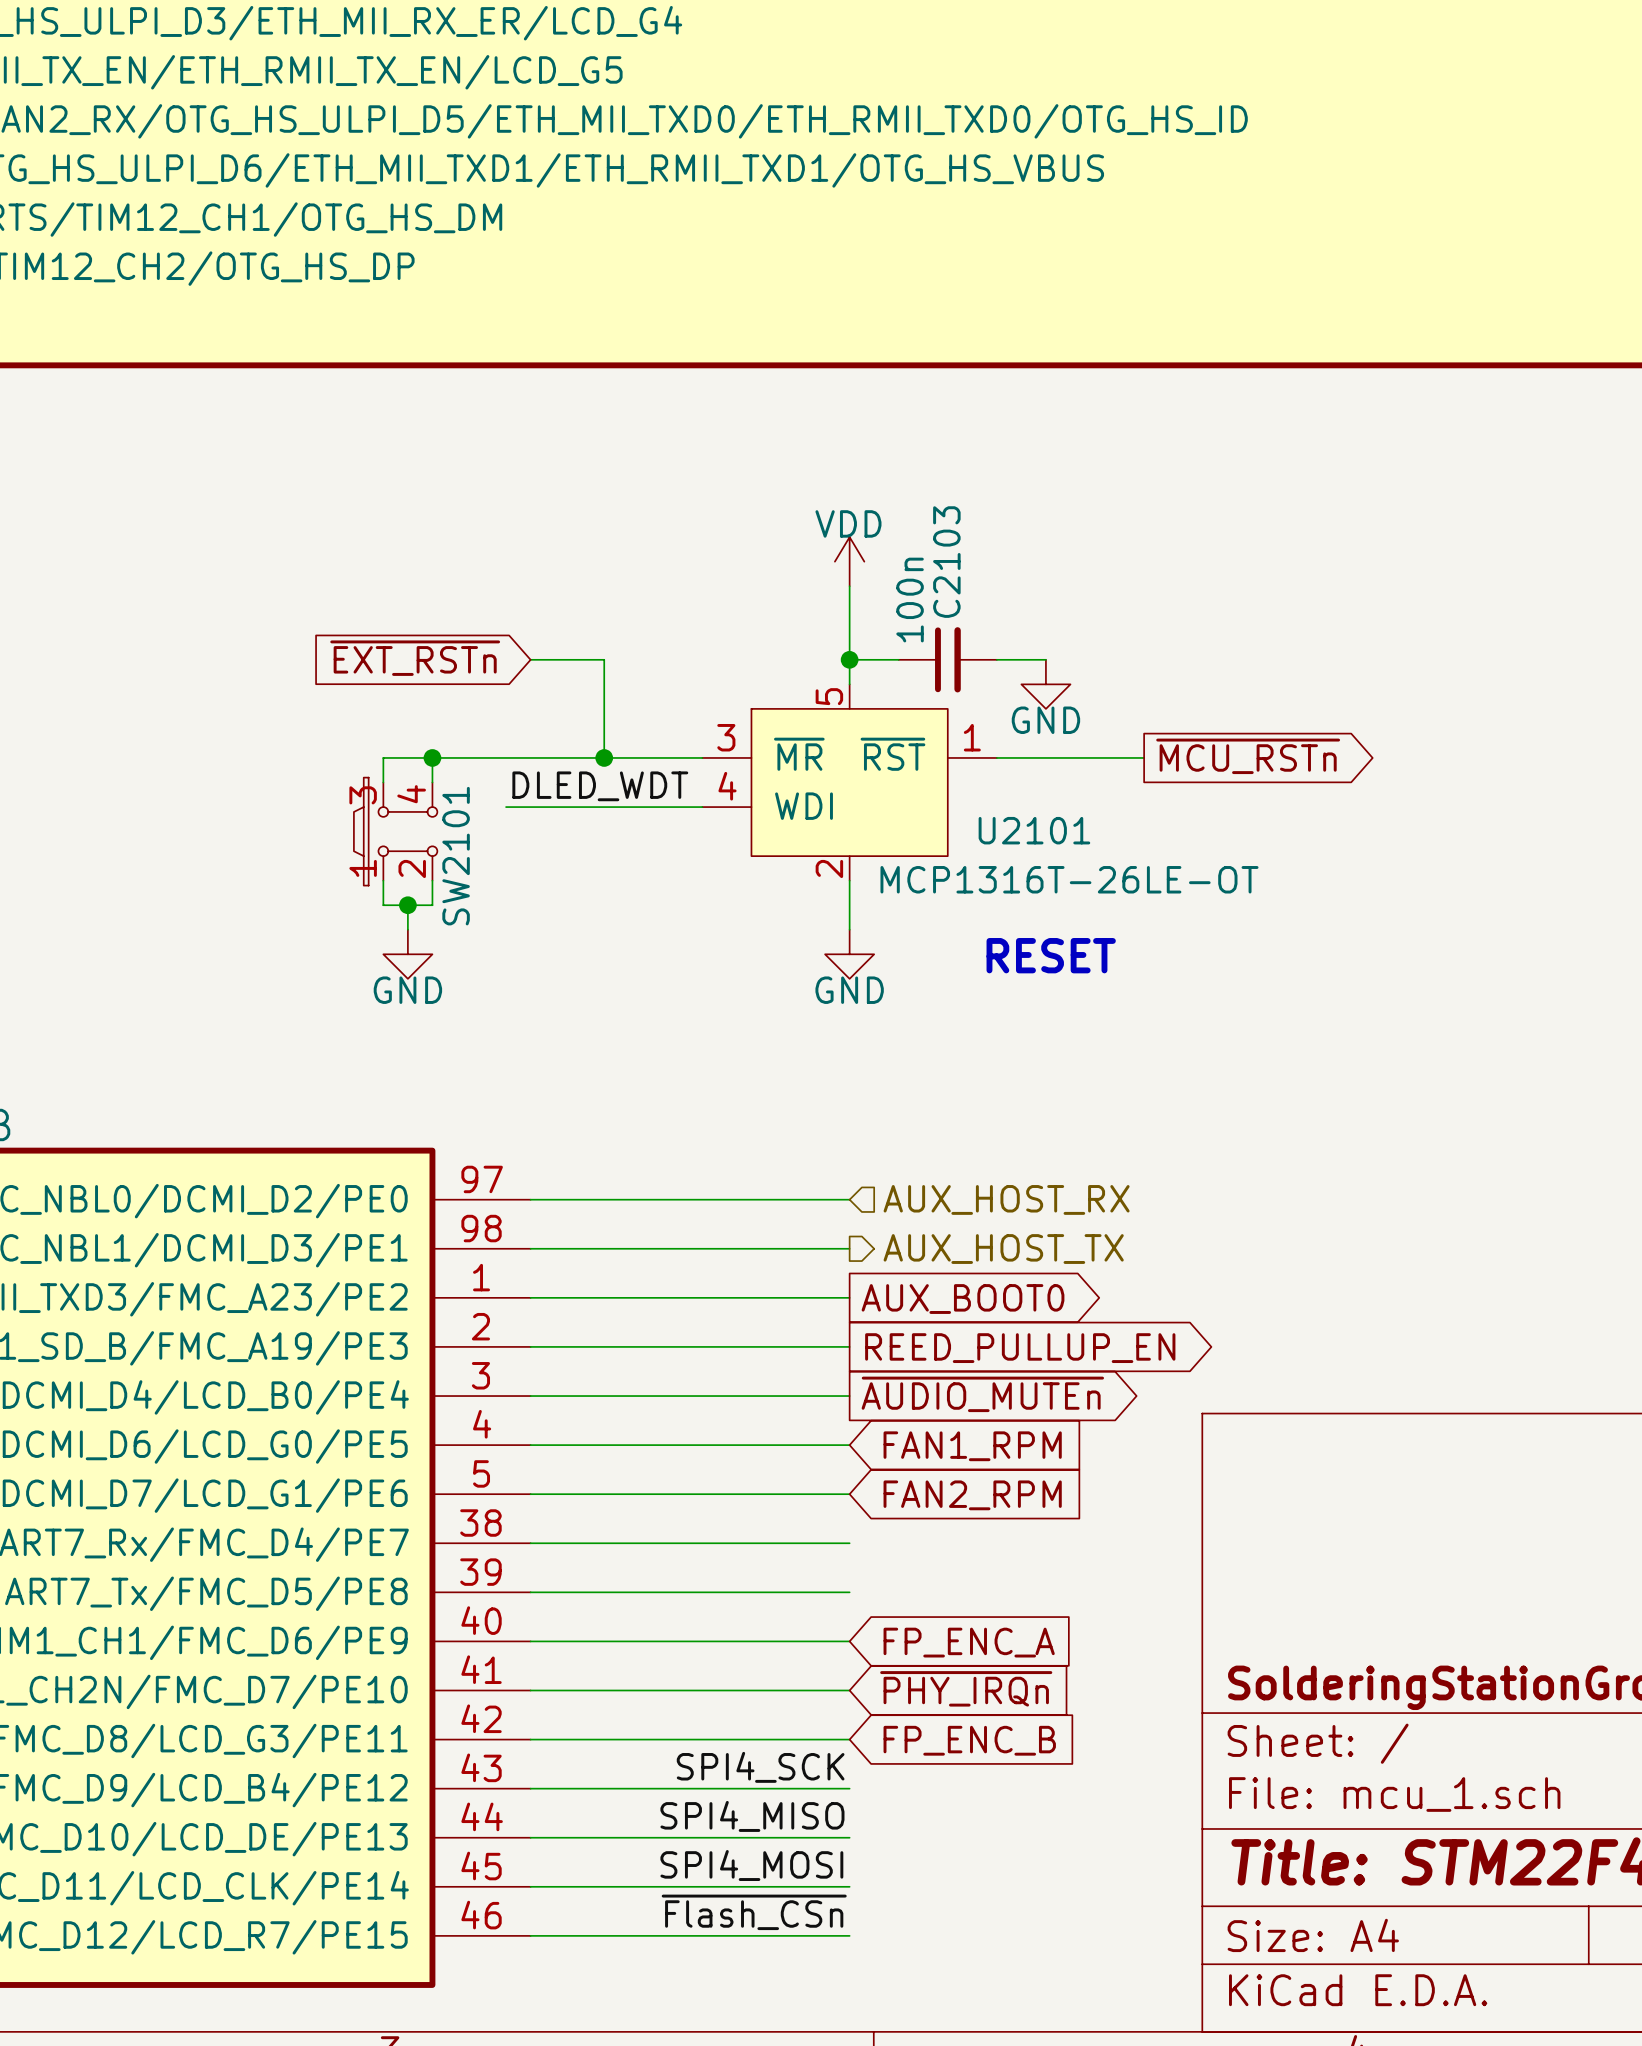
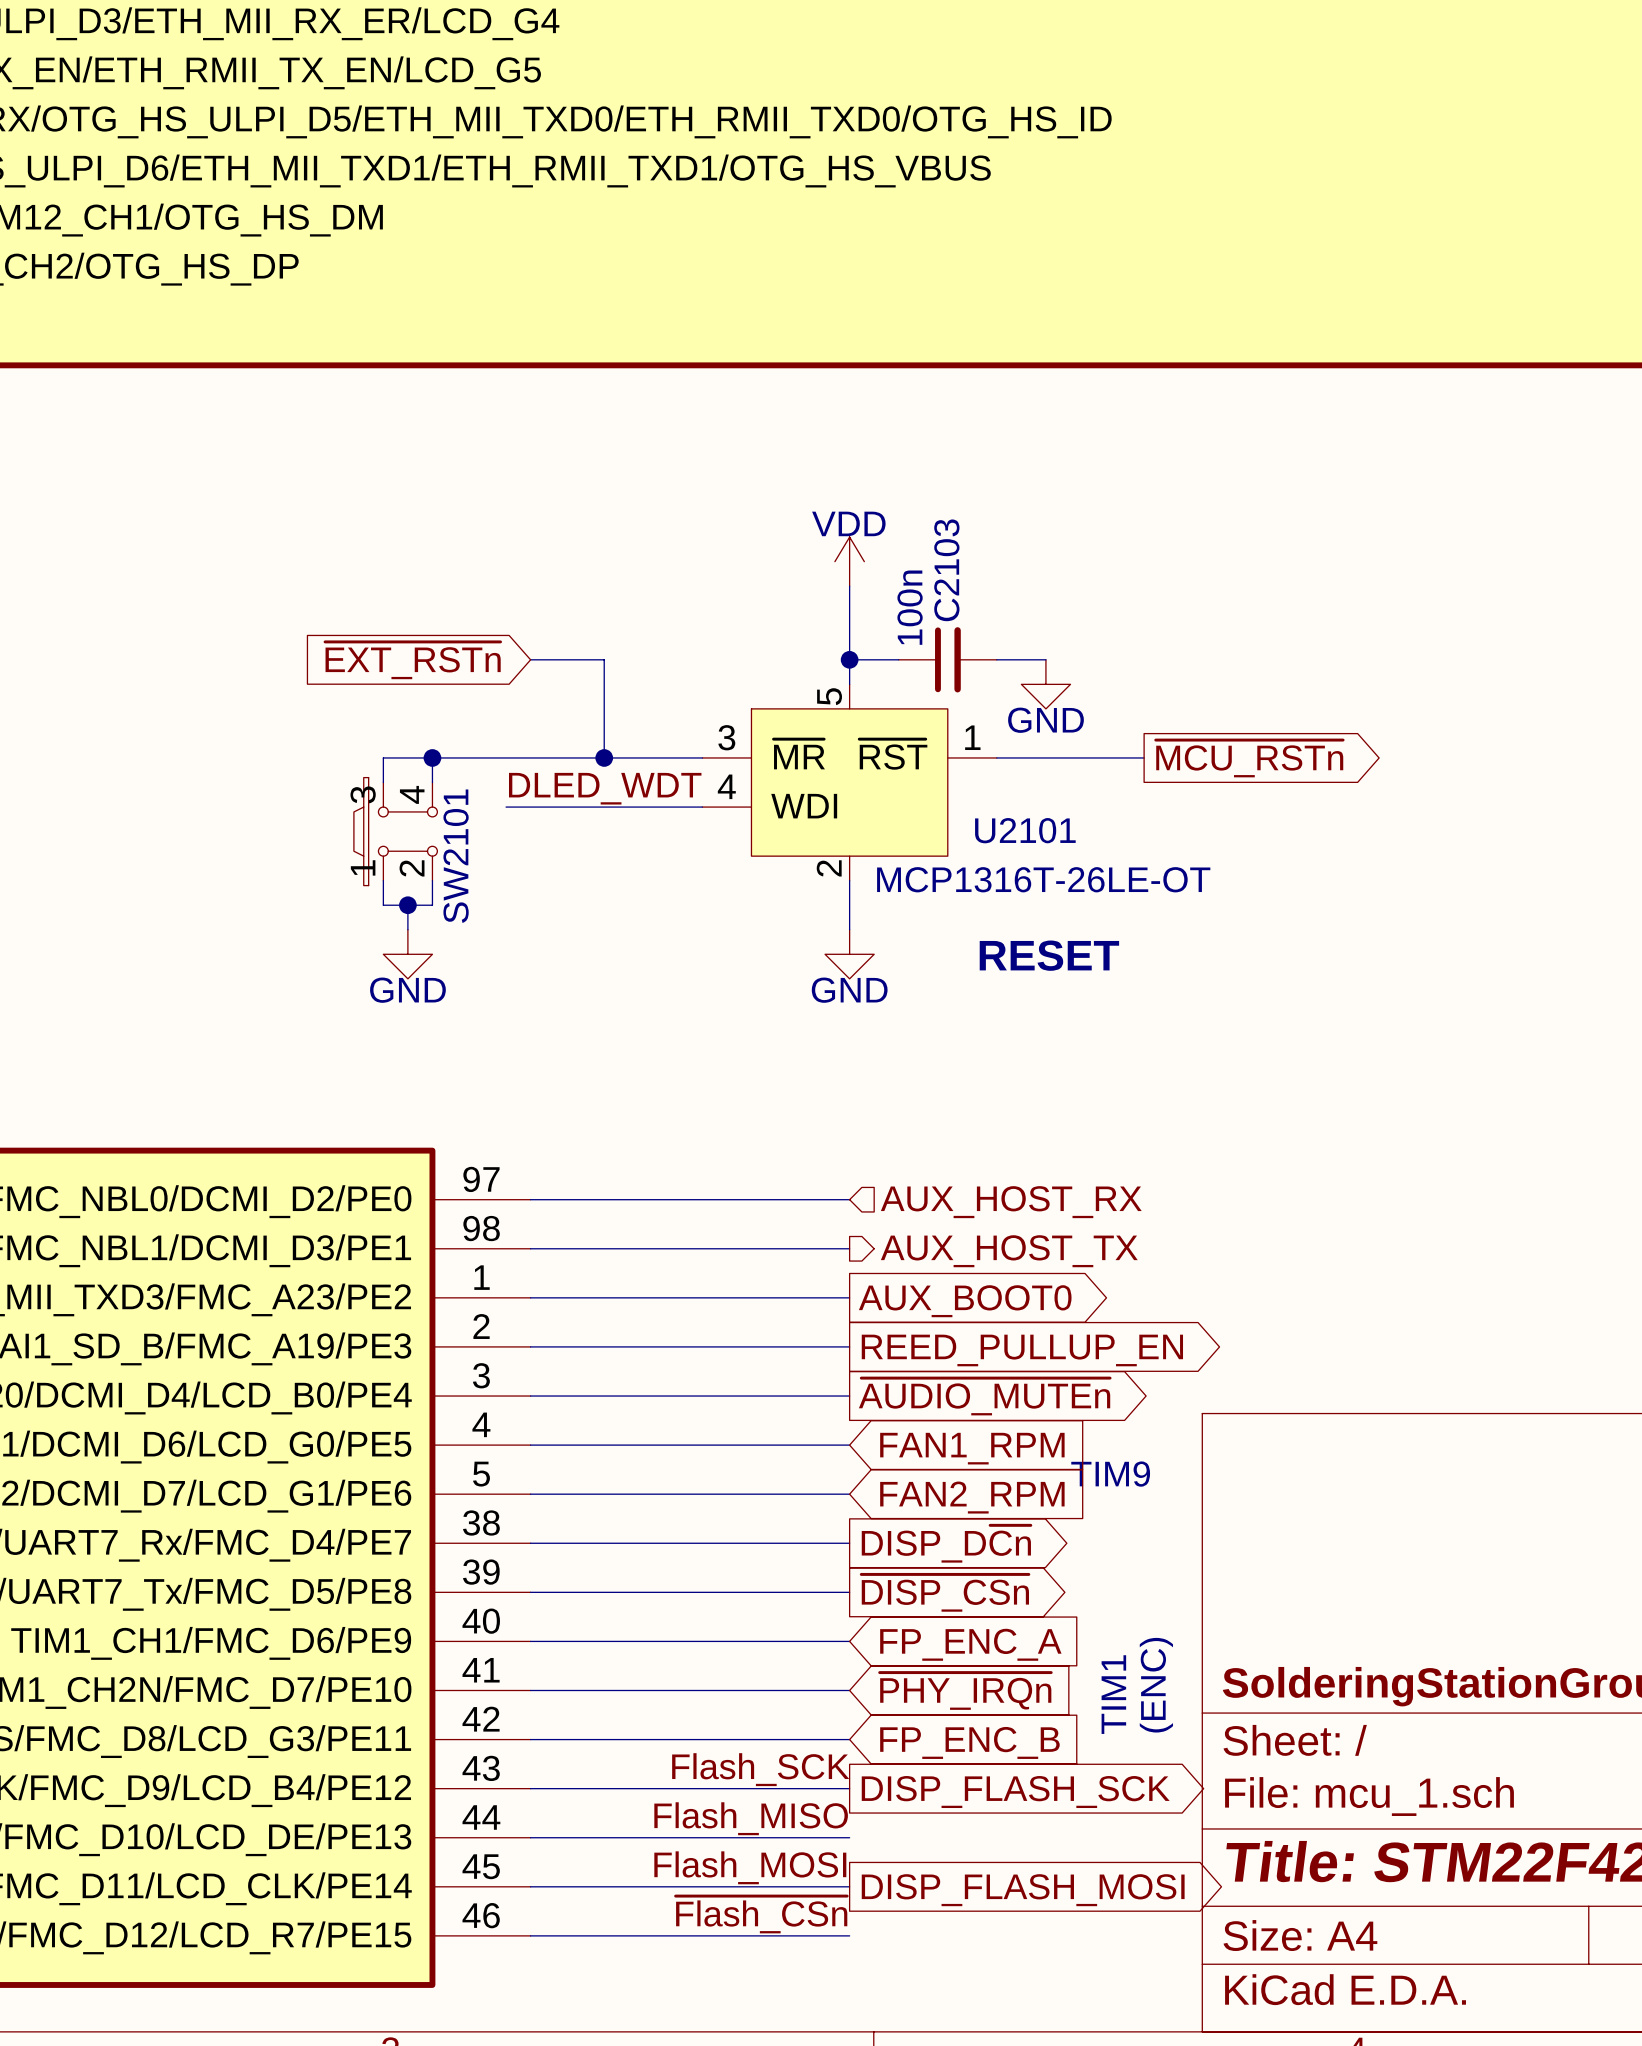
text: none -> TIM9 (1110, 1474)
global label: none -> DISP_D~{Cn} (946, 1543)
global label: none -> ~{DISP_CSn} (945, 1593)
text: none -> (ENC) (1156, 1685)
text: none -> TIM1 (1113, 1694)
label: SPI4_SCK (760, 1767) -> Flash_SCK (760, 1769)
global label: none -> DISP_FLASH_SCK (1015, 1792)
label: SPI4_MISO (752, 1816) -> Flash_MISO (751, 1818)
label: SPI4_MOSI (751, 1865) -> Flash_MOSI (750, 1867)
global label: none -> DISP_FLASH_MOSI (1023, 1890)

